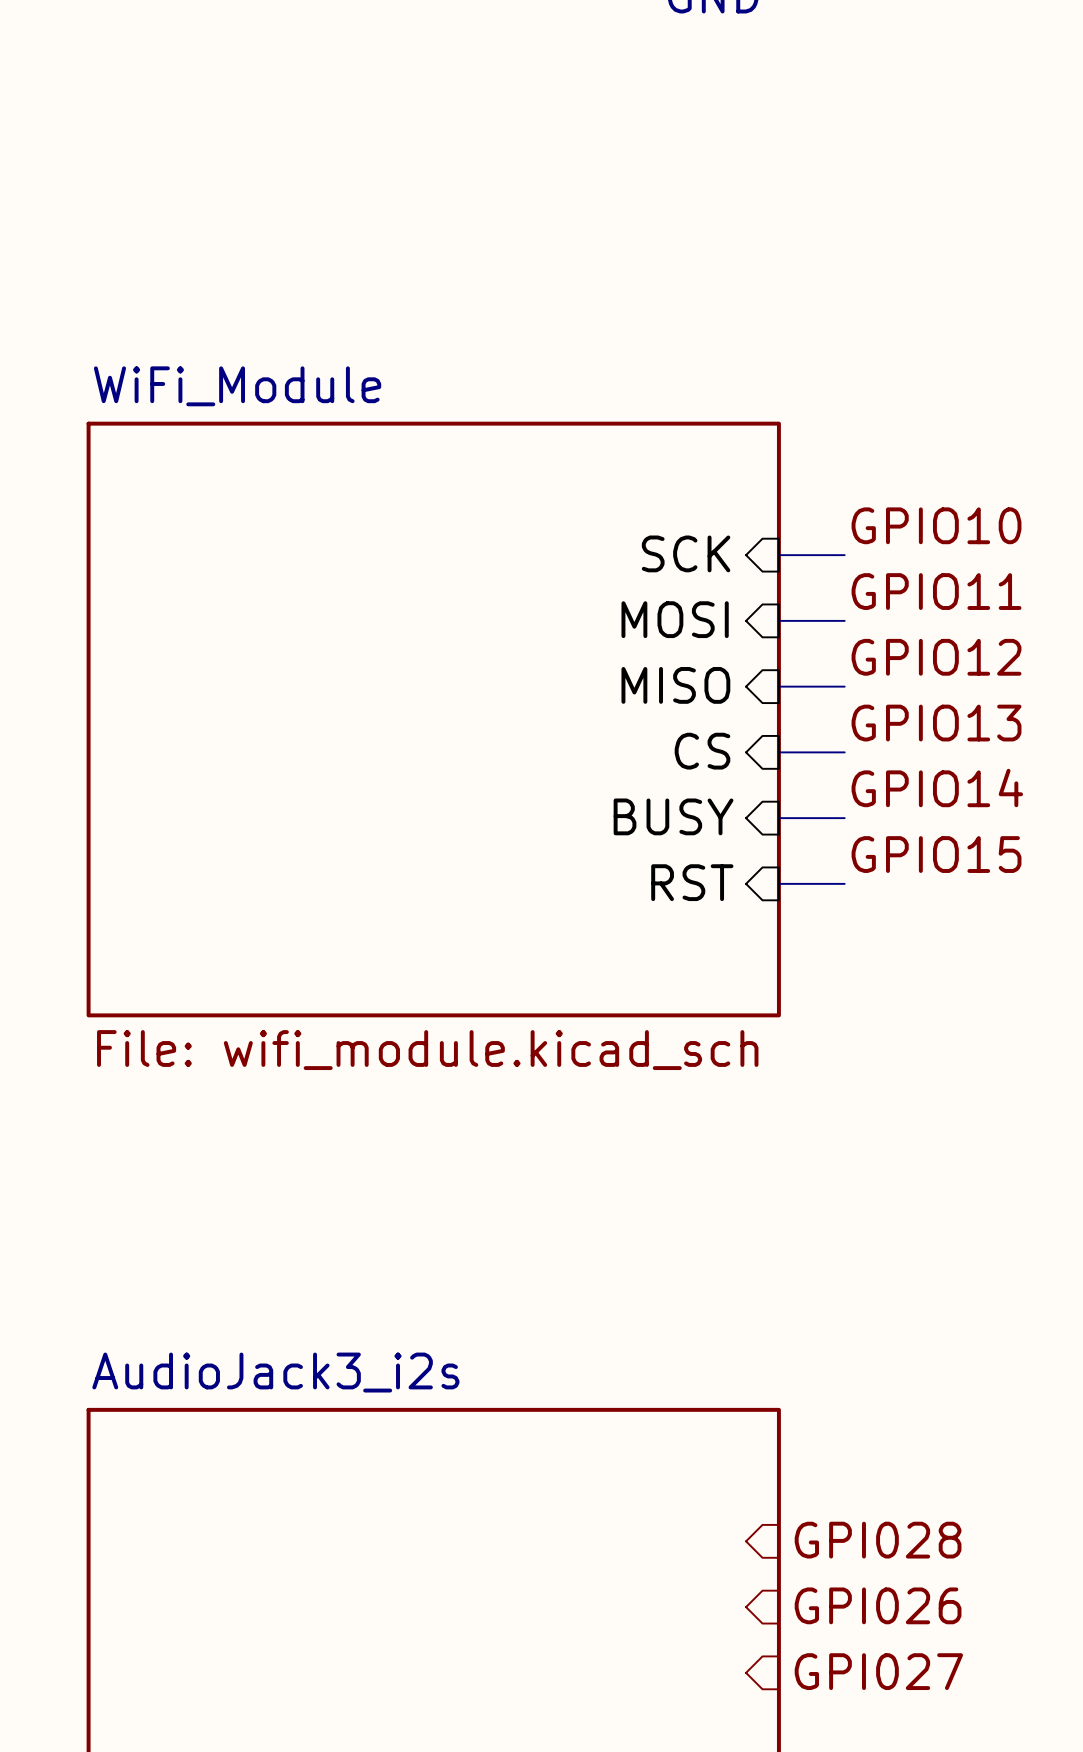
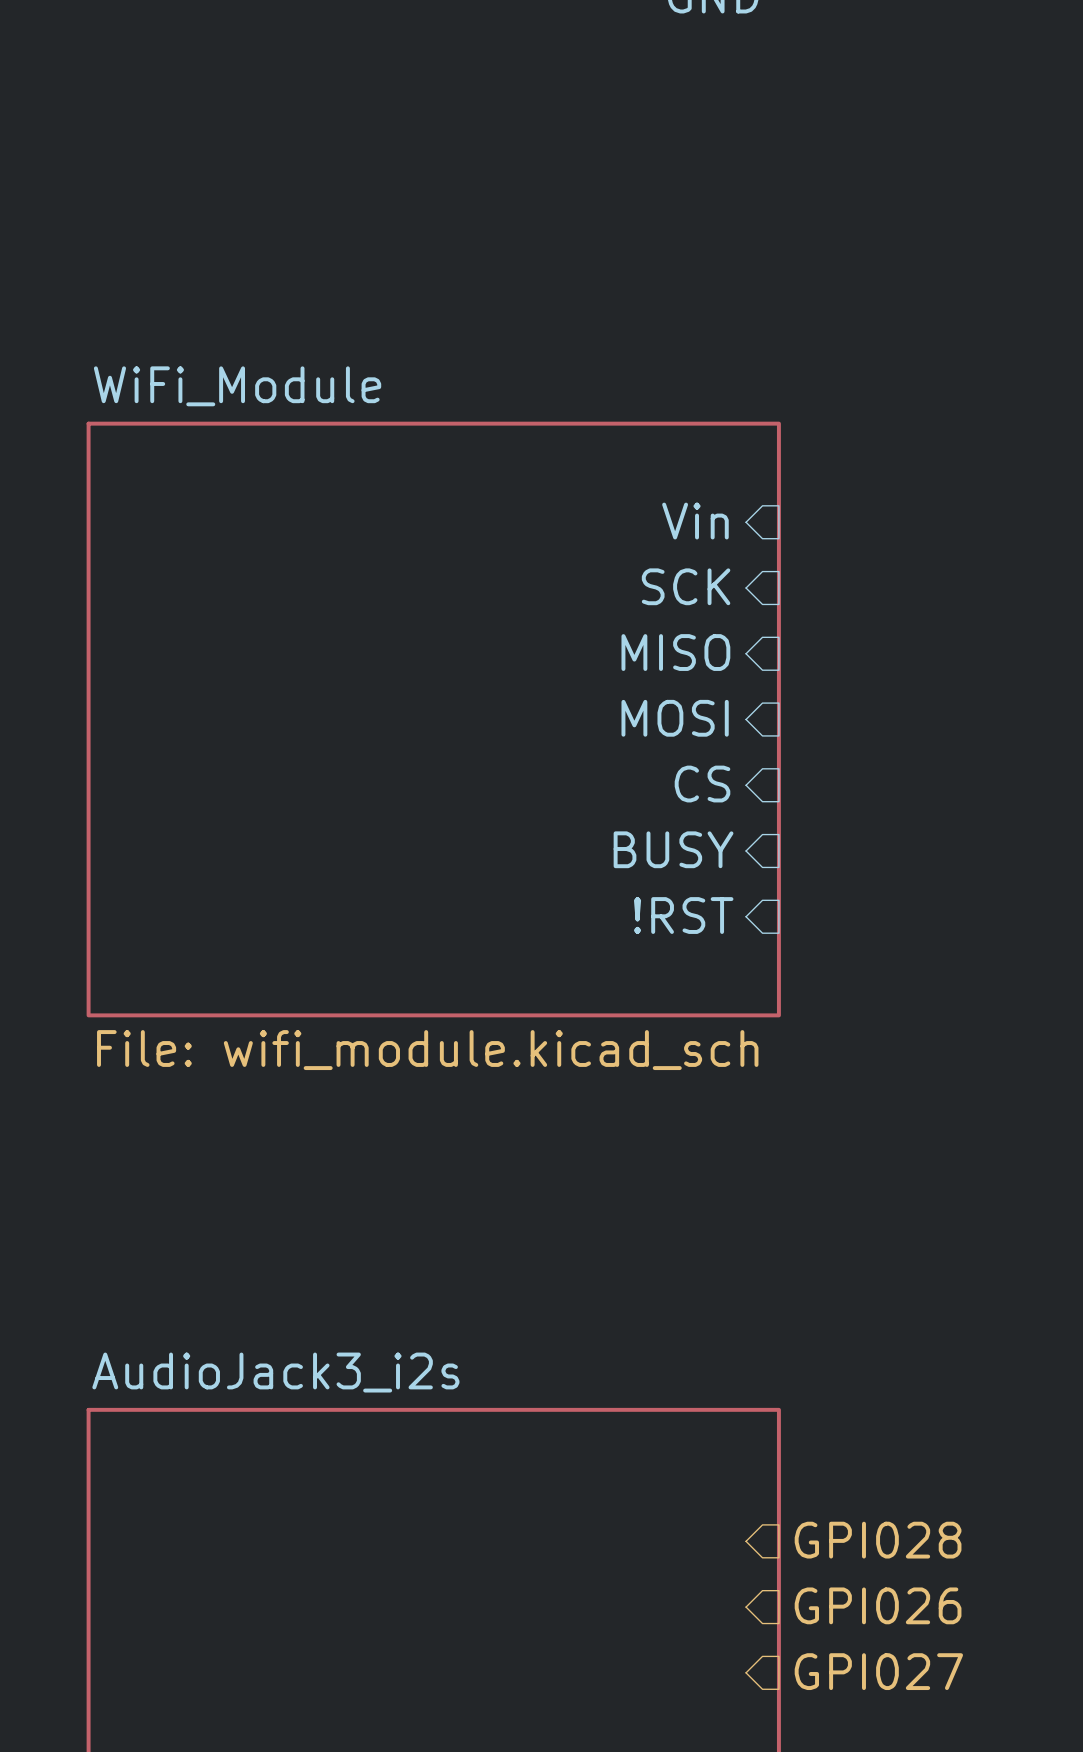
sheet pin: none -> Vin (695, 521)
label: GPIO10 (936, 525) -> none
sheet pin position: SCK (686, 553) -> SCK (686, 586)
wire: (778, 555) (844, 555) -> none
label: GPIO11 (936, 591) -> none
sheet pin position: MOSI (675, 619) -> MOSI (675, 718)
wire: (778, 620) (844, 620) -> none
label: GPIO12 (936, 657) -> none
sheet pin position: MISO (675, 685) -> MISO (675, 652)
wire: (778, 686) (844, 686) -> none
label: GPIO13 (936, 723) -> none
sheet pin position: CS (702, 751) -> CS (702, 784)
wire: (778, 752) (844, 752) -> none
label: GPIO14 (937, 788) -> none
sheet pin position: BUSY (673, 816) -> BUSY (673, 849)
wire: (778, 818) (844, 818) -> none
label: GPIO15 (936, 854) -> none
sheet pin: RST (692, 882) -> !RST (683, 915)
wire: (778, 883) (844, 883) -> none

